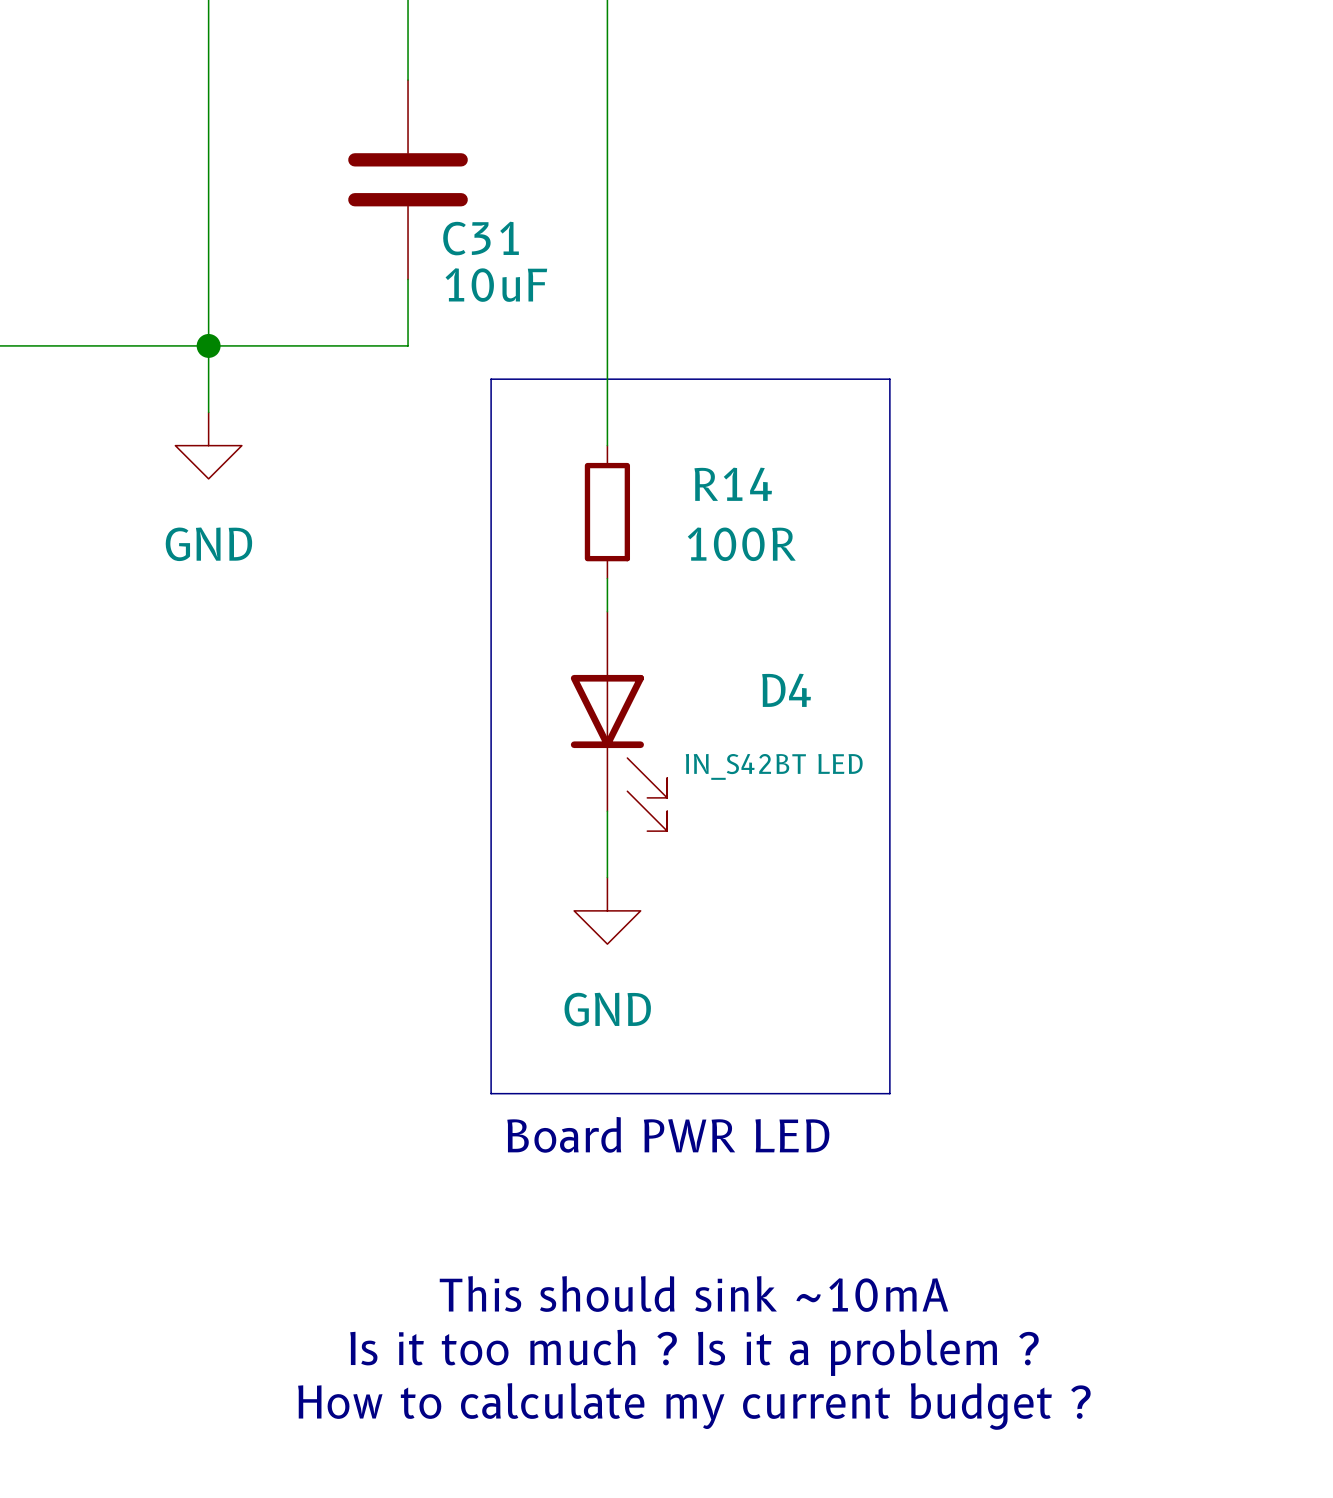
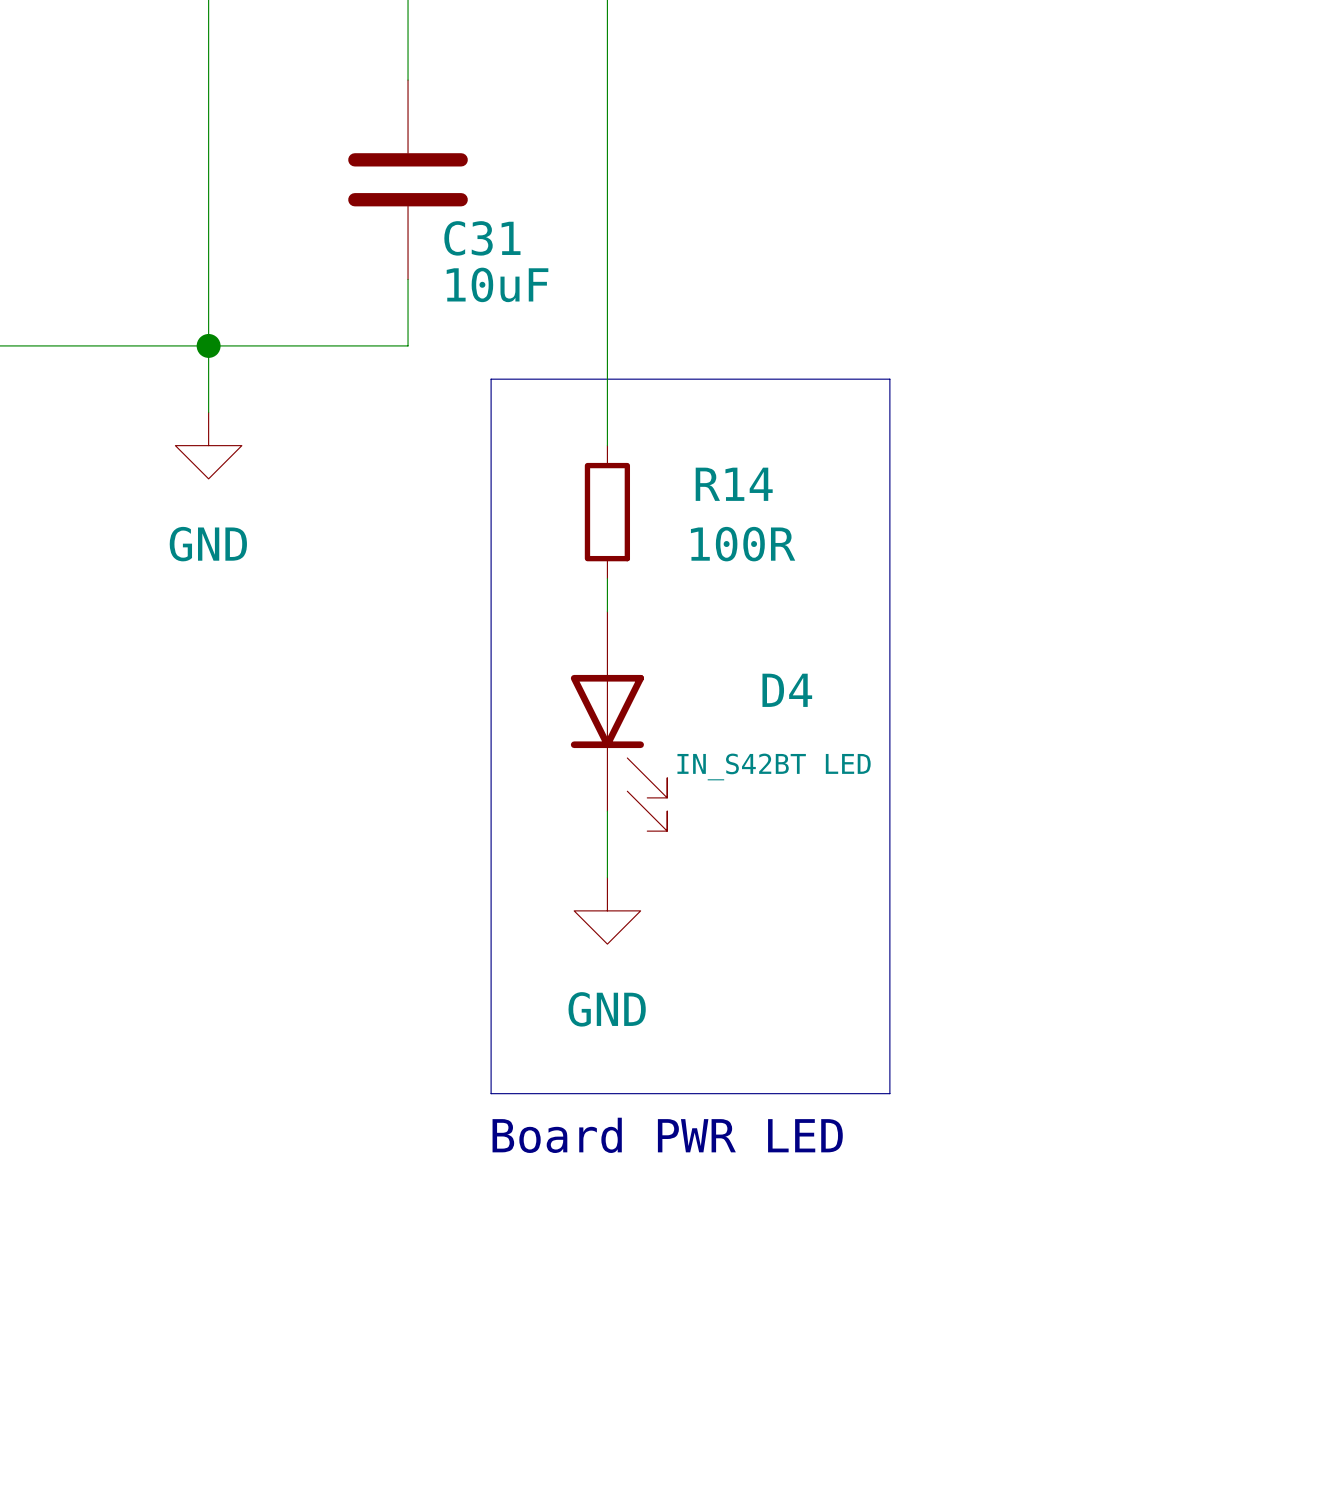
text: This should sink ~10mA (693, 1294) -> none
text: Is it too much ? Is it a problem ? (694, 1352) -> none
text: How to calculate my current budget ? (694, 1406) -> none

